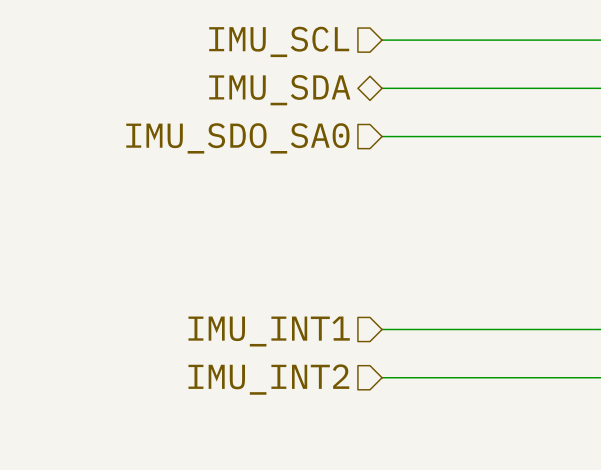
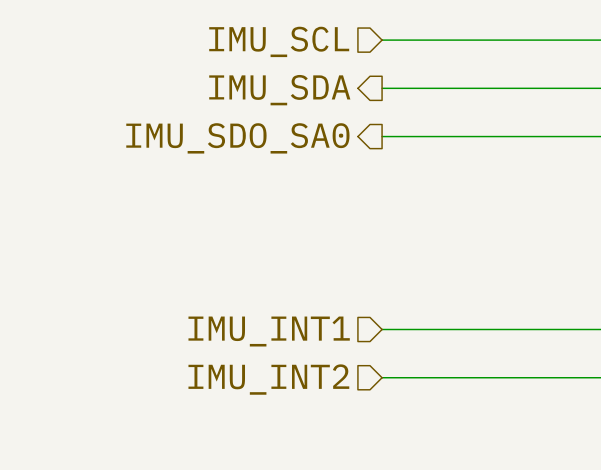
hierarchical label shape: bidirectional (279, 90) -> output (279, 90)
hierarchical label shape: input (237, 138) -> output (237, 138)

